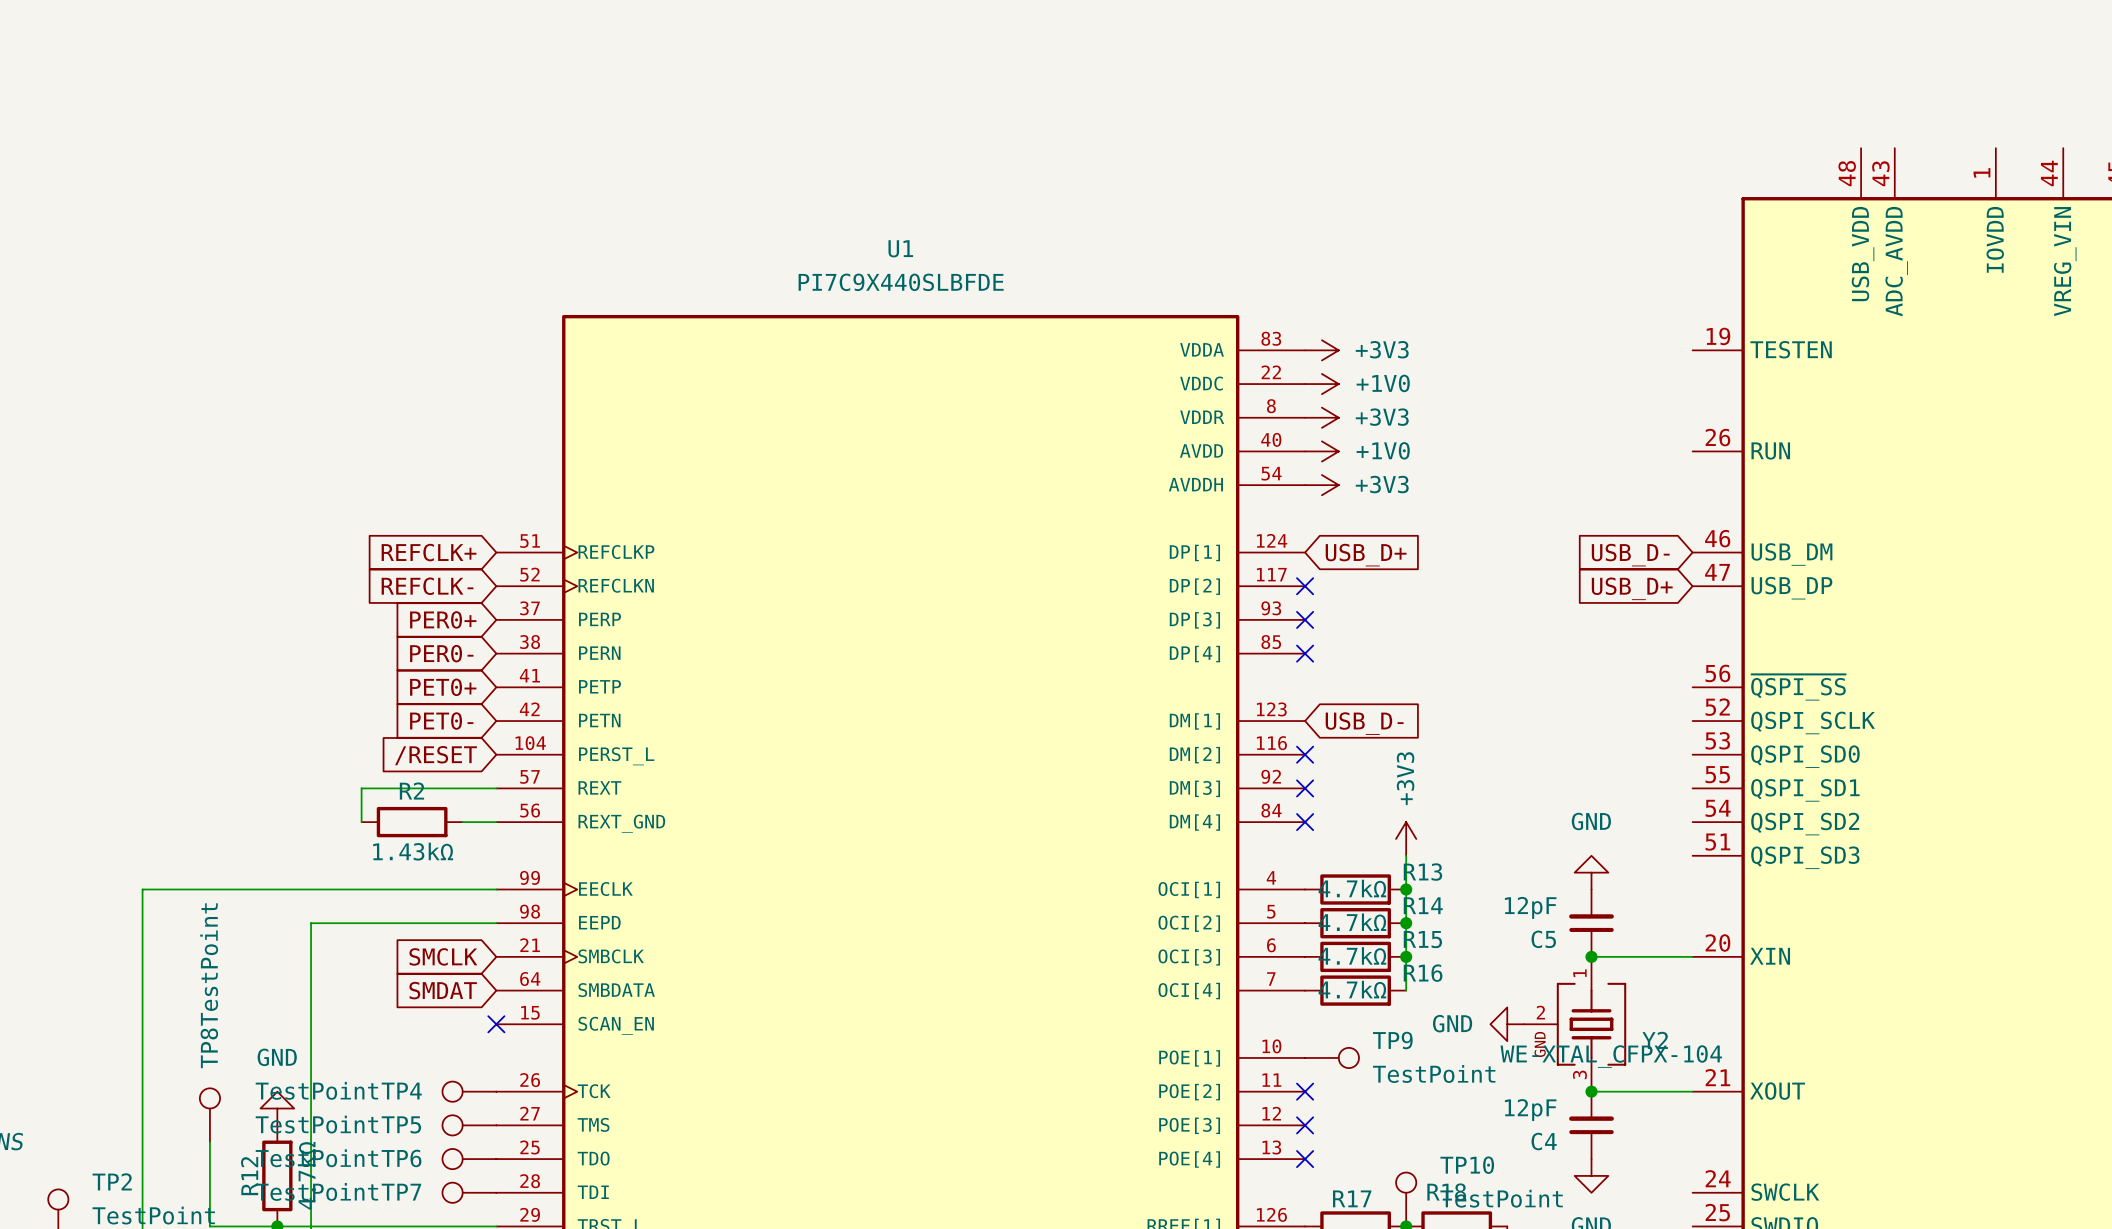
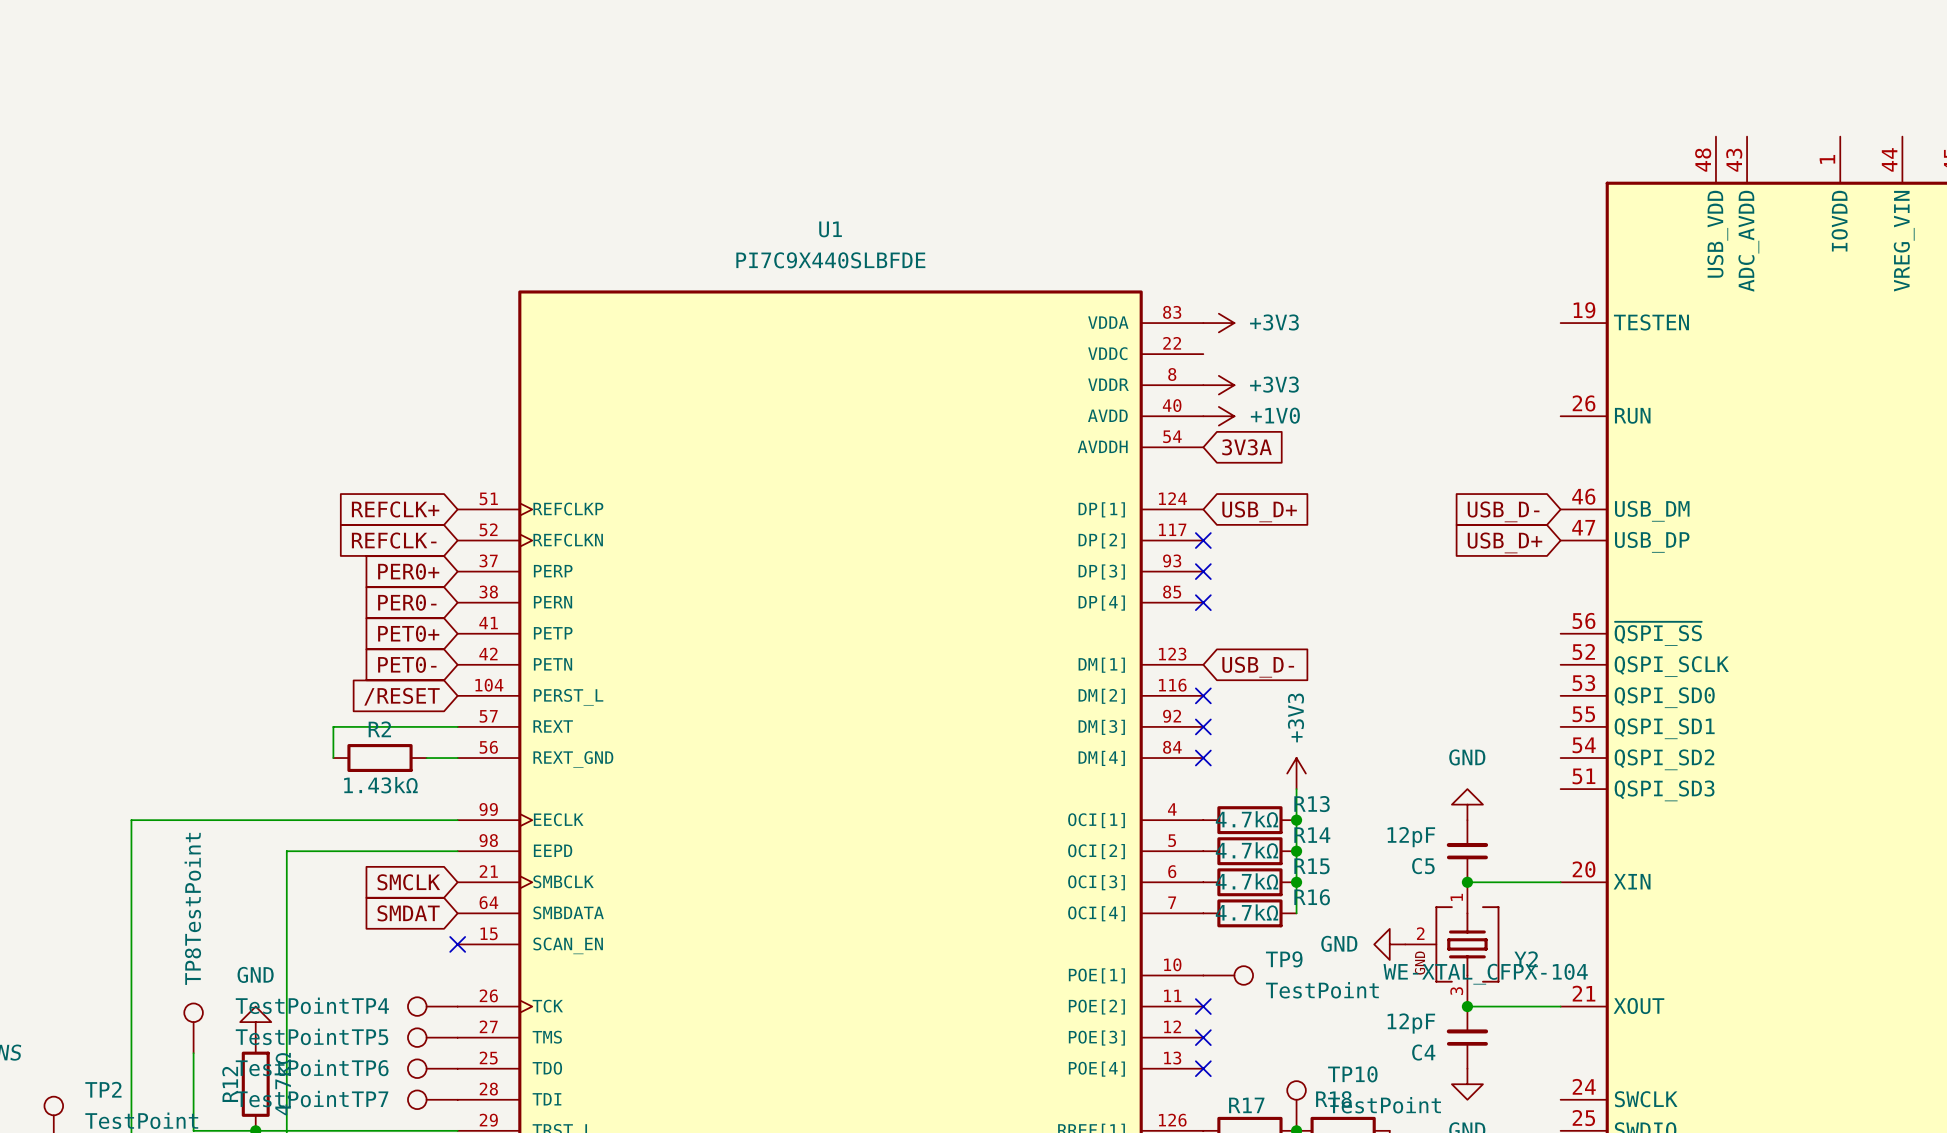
power symbol: +1V0 (1321, 384) -> none
power symbol: +3V3 (1321, 485) -> none
global label: none -> 3V3A (1246, 447)

